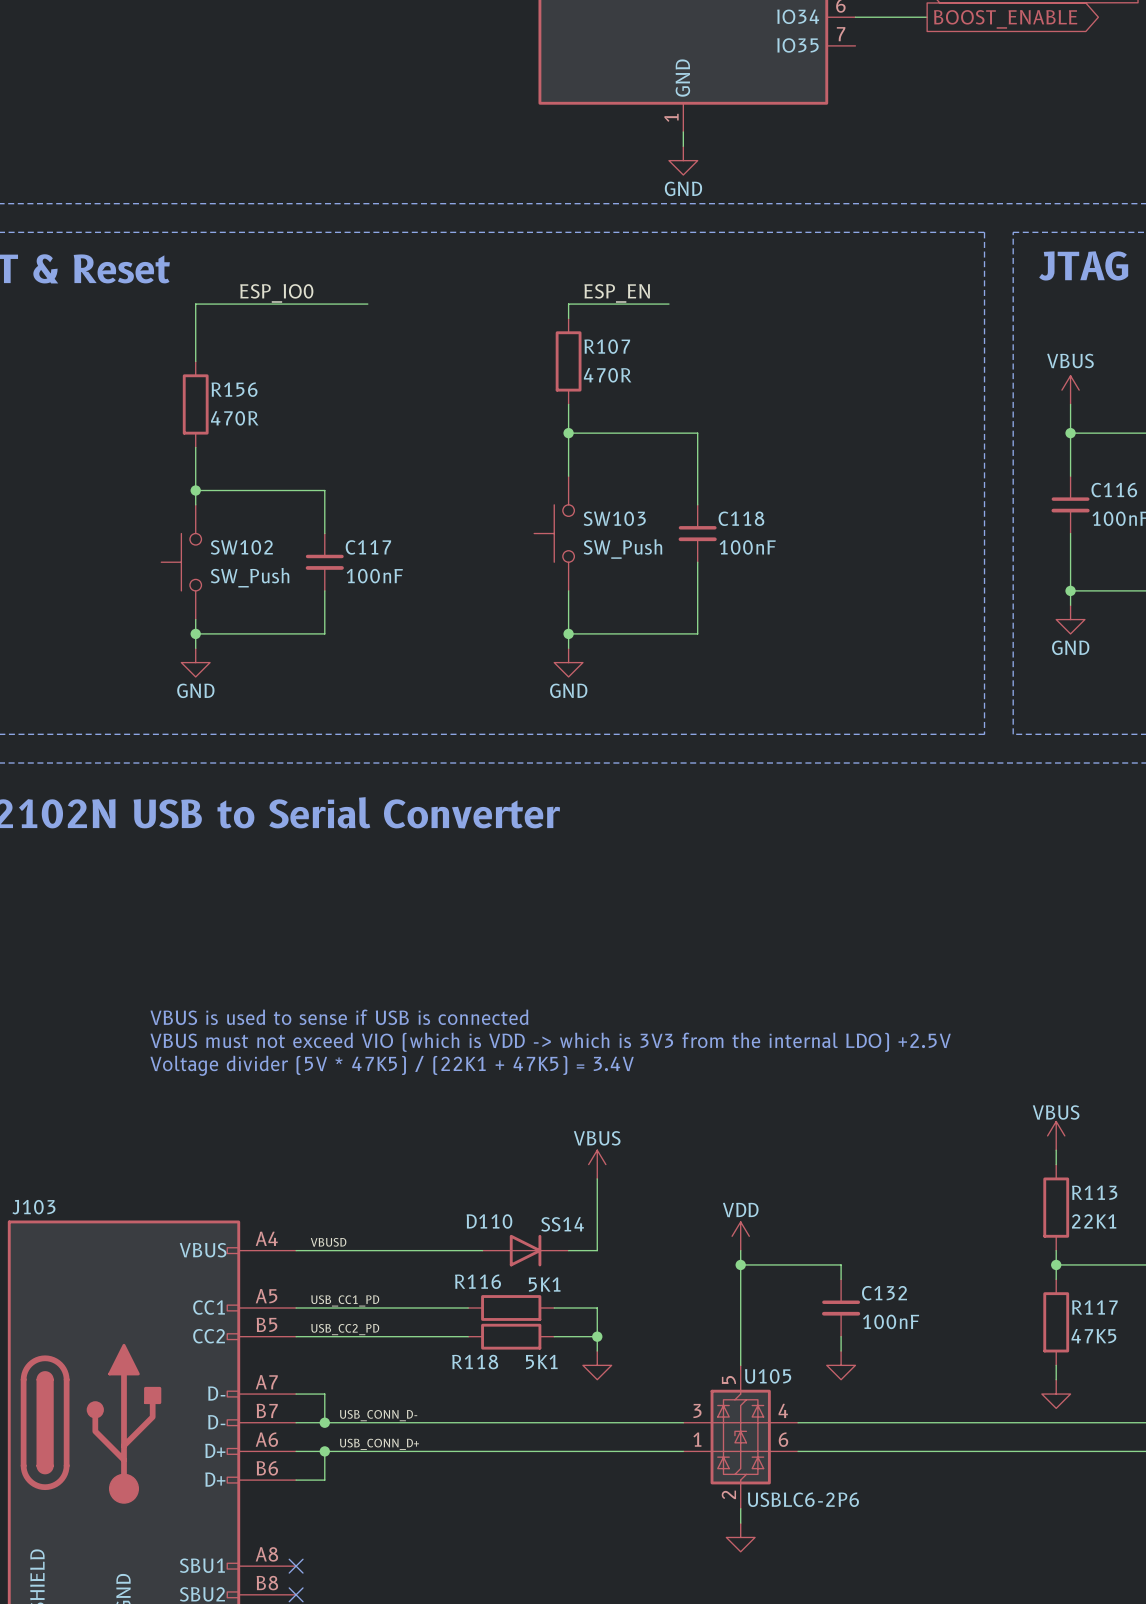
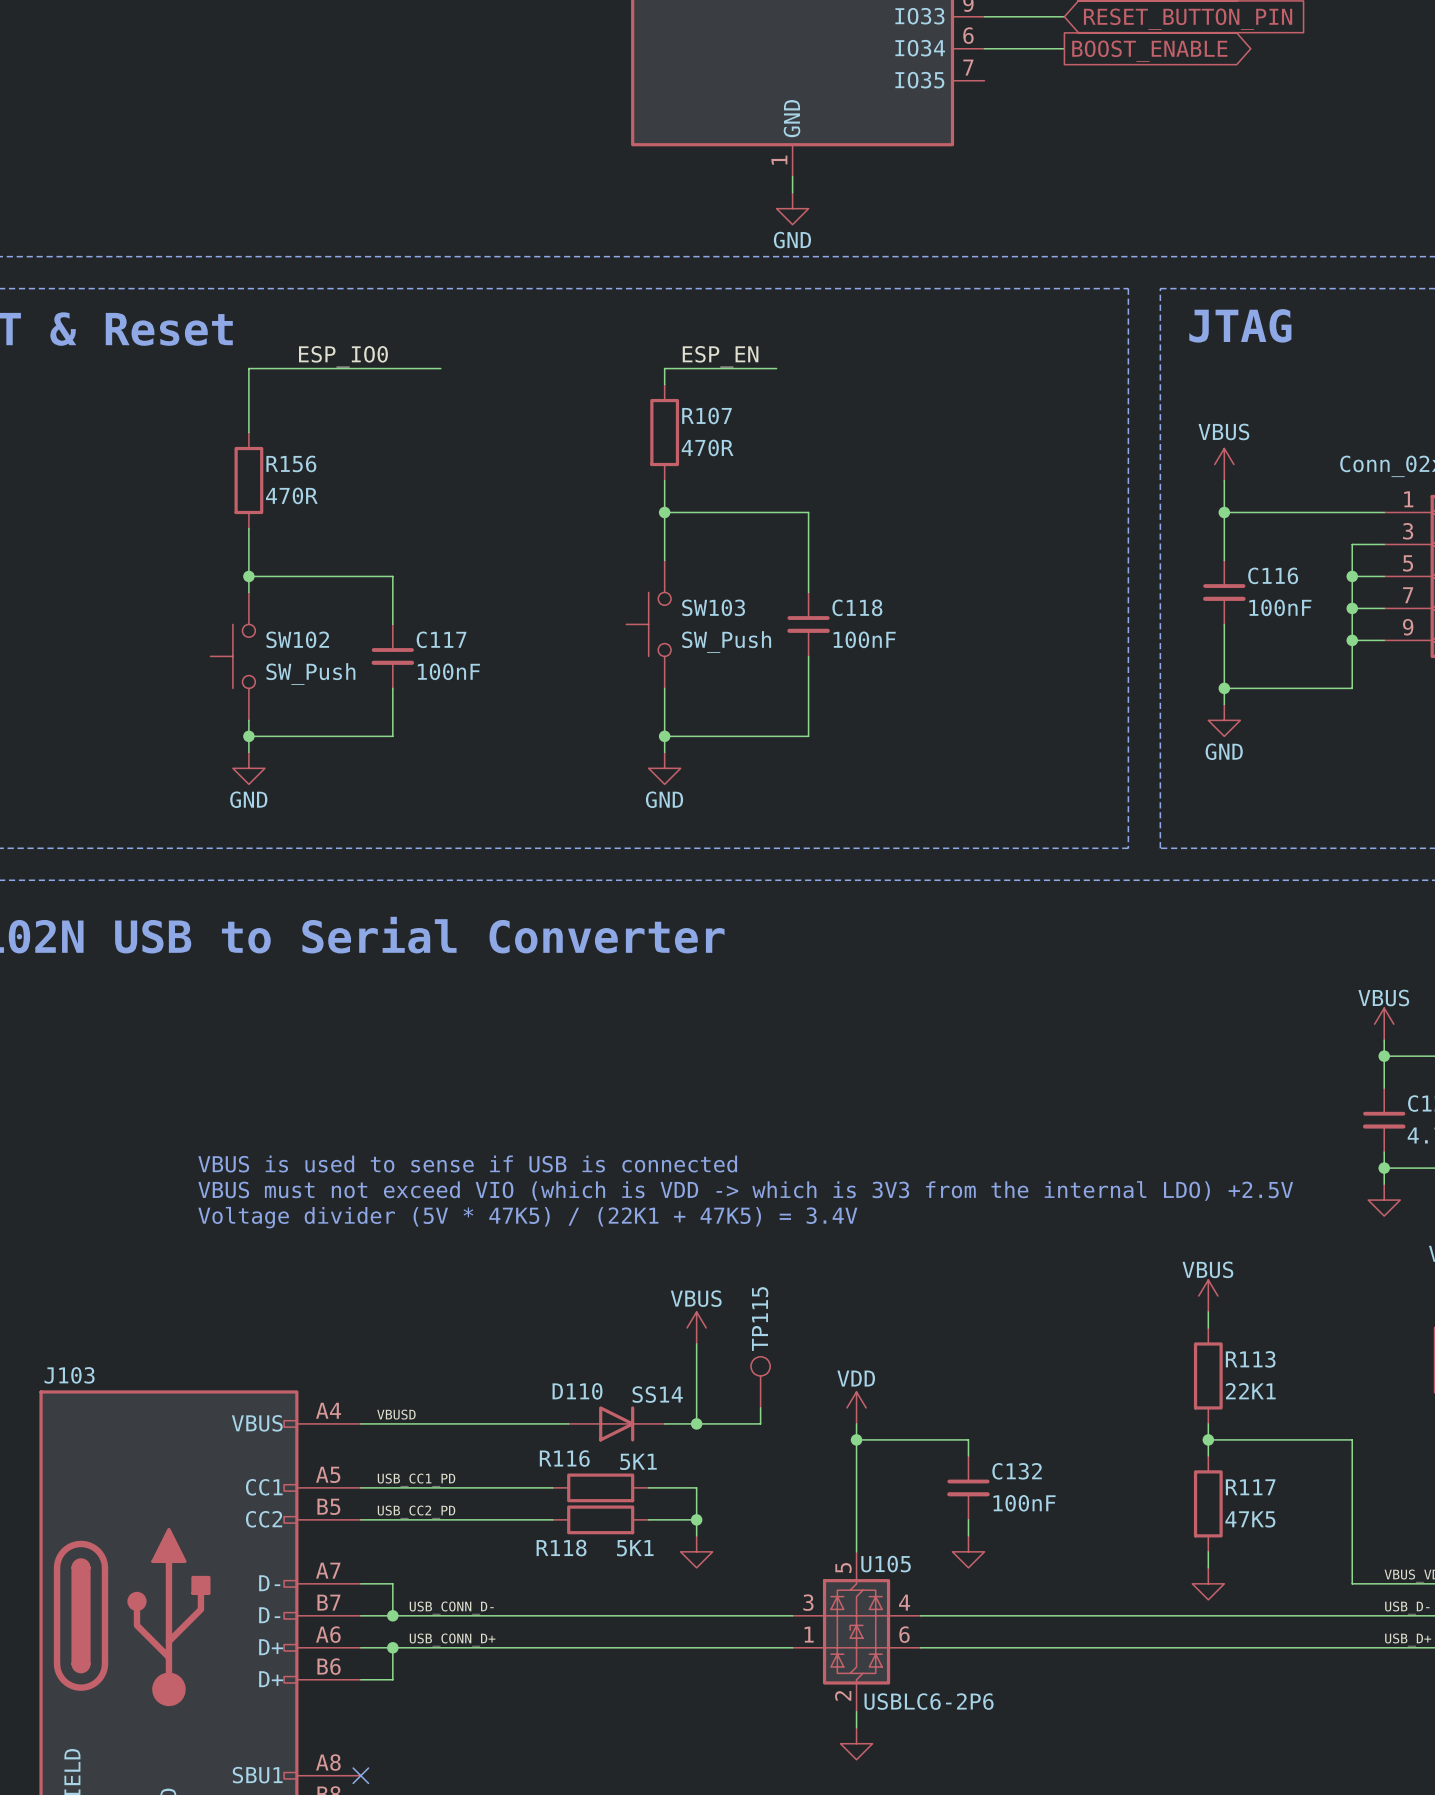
TP115: none -> (760, 1382)
wire: none -> (760, 1407) (760, 1423) (696, 1423)
junction: none -> (696, 1423)

